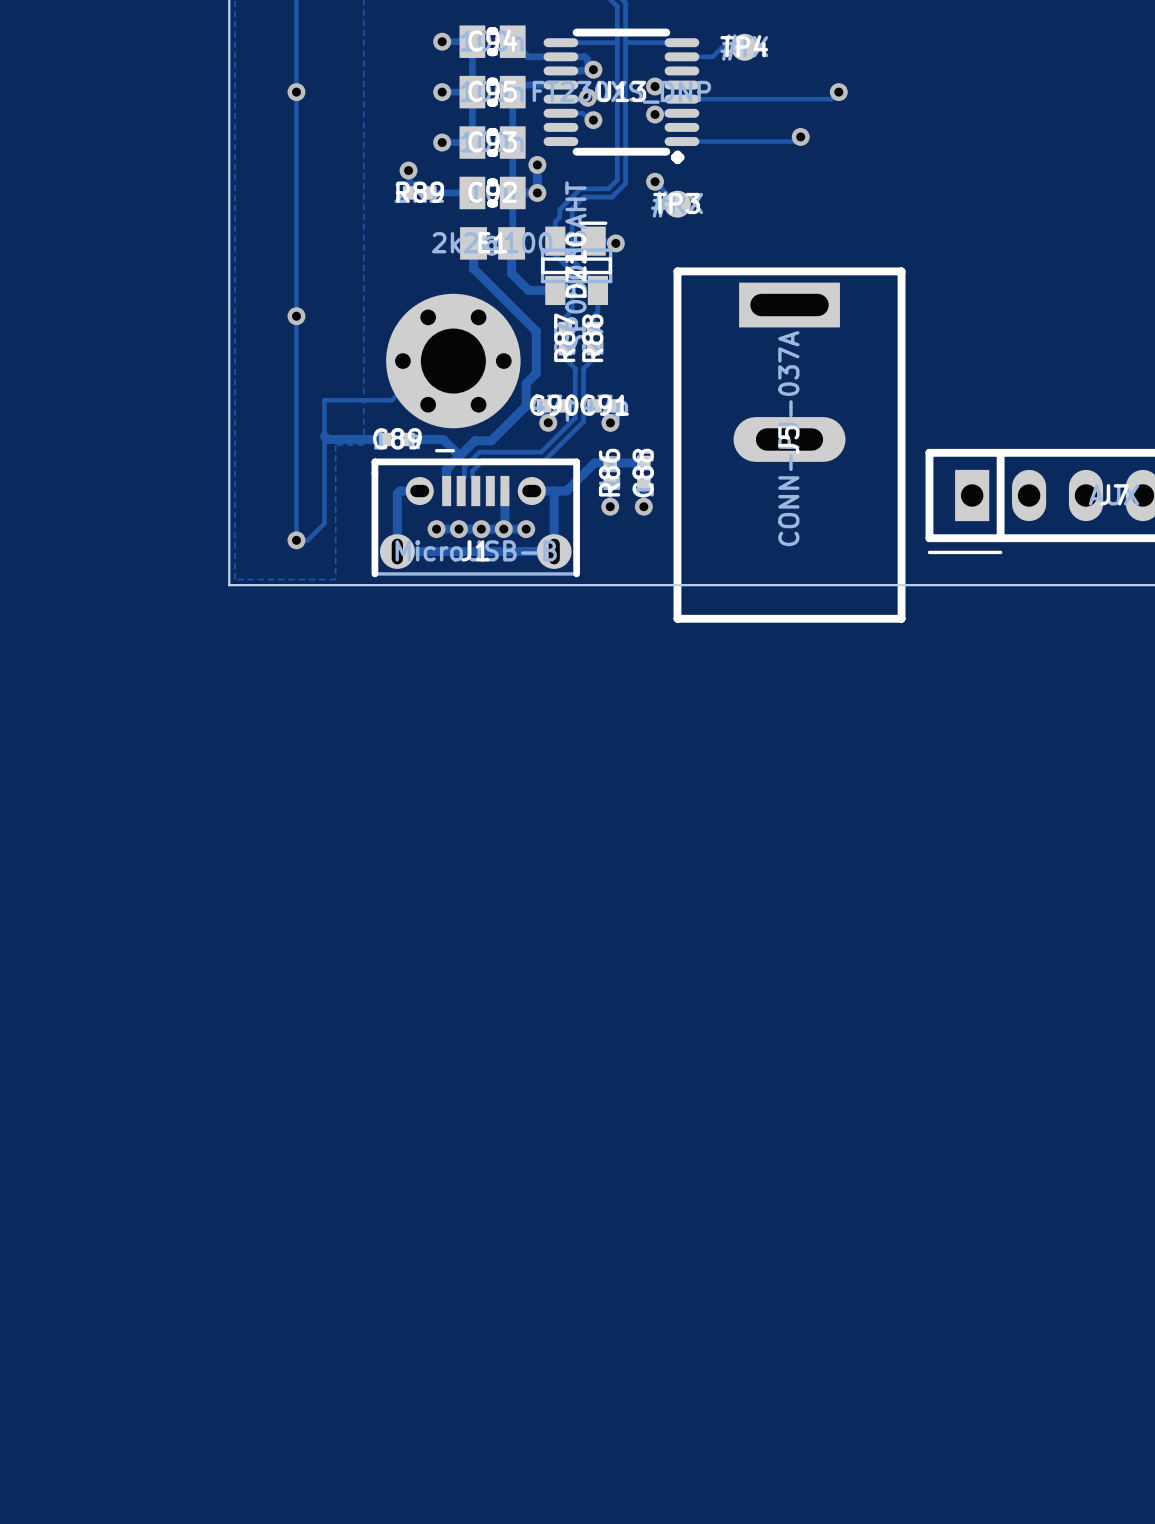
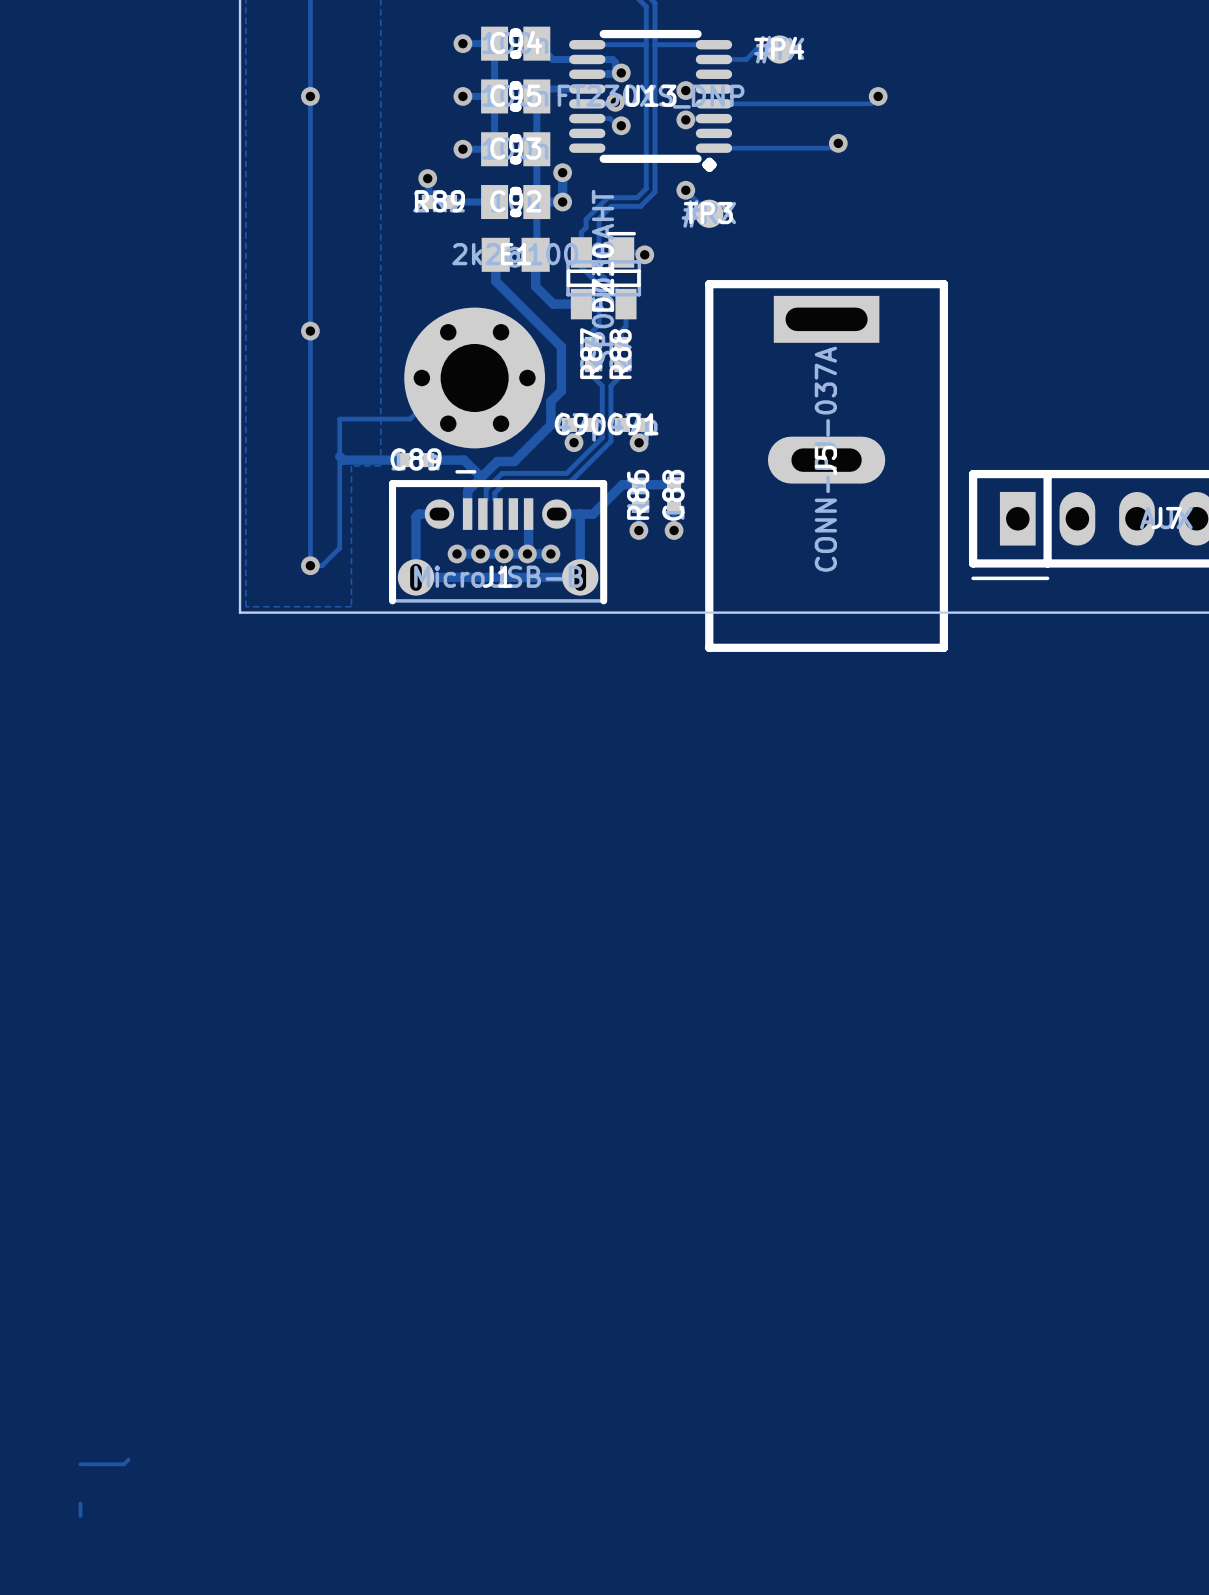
track: none -> (128, 1459) (123, 1464) (80, 1464)
track: none -> (80, 1503) (80, 1515)

